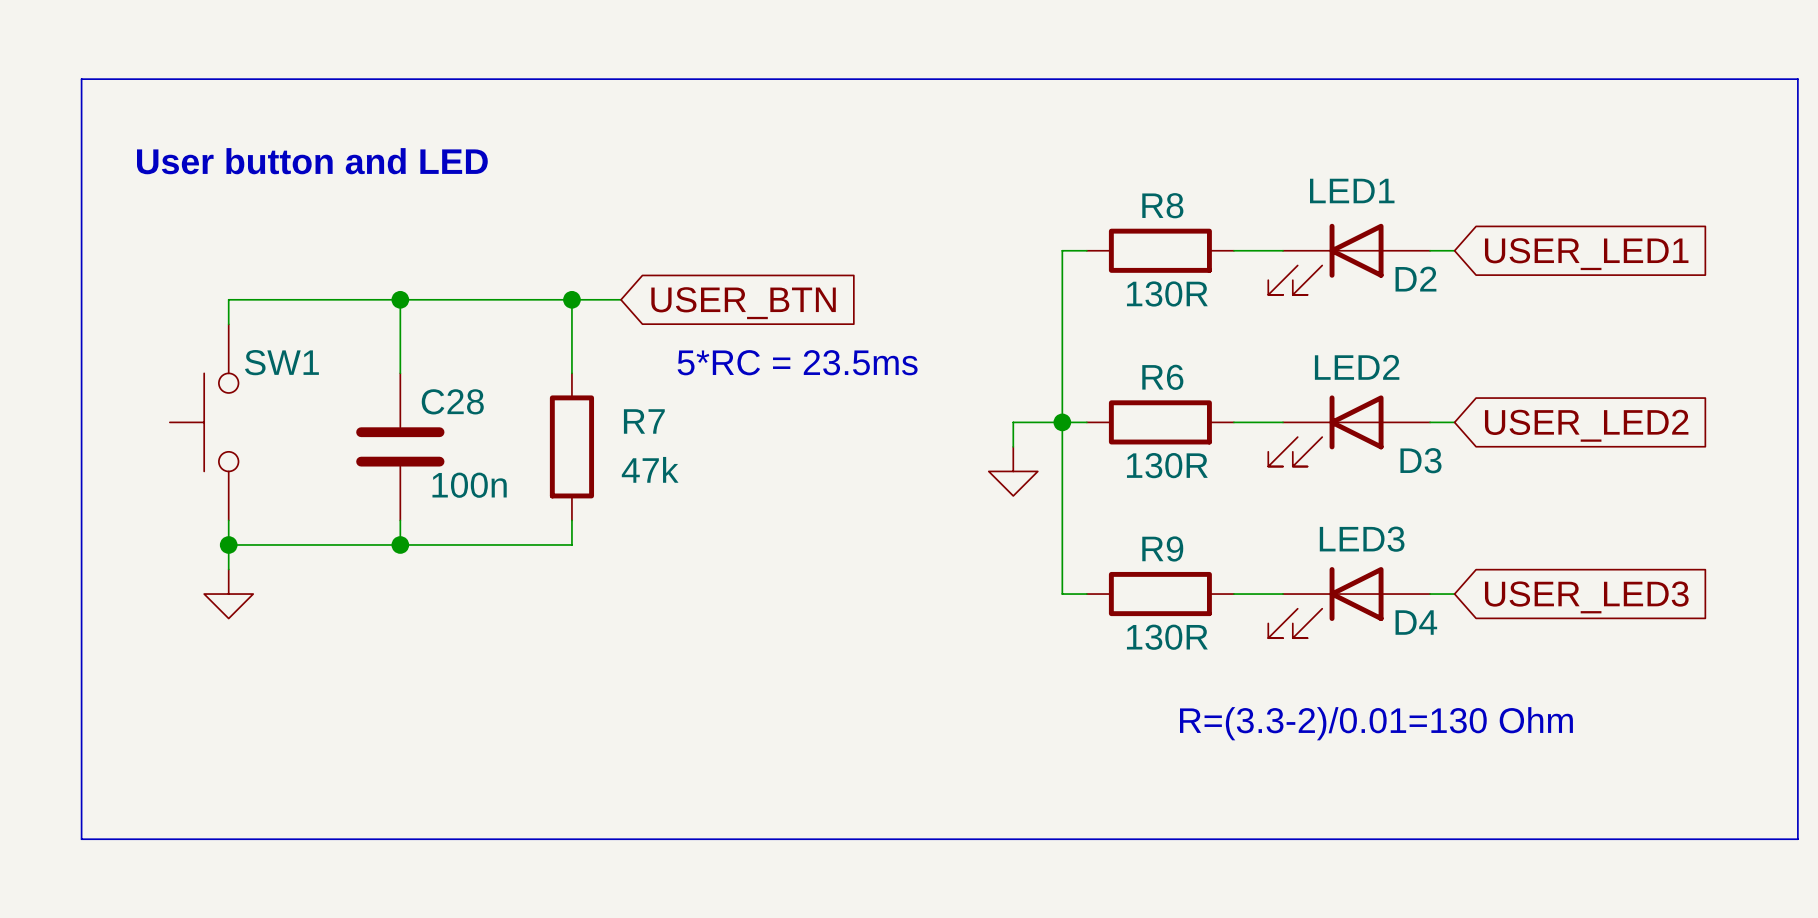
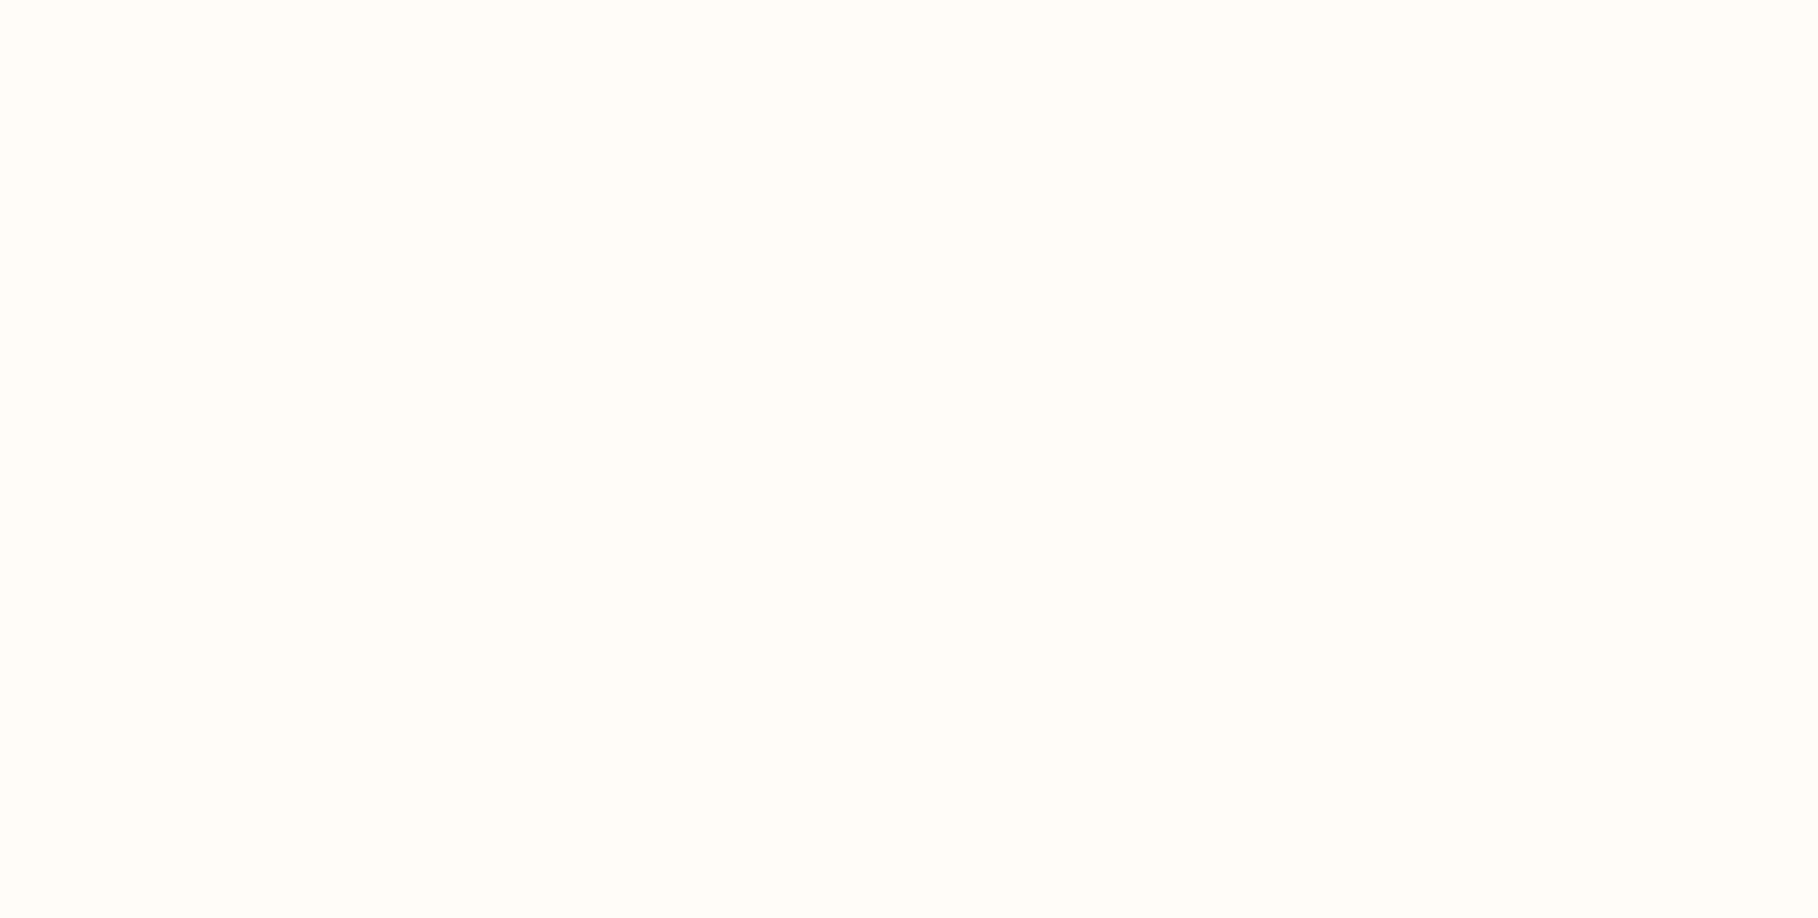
line: (81, 79) (1797, 79) (1797, 839) (81, 839) (81, 79) -> none
text: User button and LED (312, 161) -> none
wire: (1086, 250) (1062, 250) (1062, 594) (1086, 594) -> none
R8: 130R (1160, 250) -> none
wire: (1233, 250) (1283, 250) -> none
wire: (1430, 250) (1454, 250) -> none
global label: USER_LED1 (1586, 254) -> none
D2: LED1 (1349, 259) -> none
wire: (400, 299) (400, 373) -> none
junction: (400, 299) -> none
wire: (571, 299) (571, 373) -> none
junction: (571, 299) -> none
wire: (620, 299) (228, 299) (228, 324) -> none
global label: USER_BTN (743, 303) -> none
text: 5*RC = 23.5ms (797, 362) -> none
SW1: (204, 422) -> none
junction: (1062, 422) -> none
wire: (1086, 422) (1013, 422) (1013, 446) -> none
R6: 130R (1160, 422) -> none
wire: (1233, 422) (1283, 422) -> none
wire: (1430, 422) (1454, 422) -> none
global label: USER_LED2 (1586, 425) -> none
D3: LED2 (1349, 430) -> none
C28: 100n (400, 446) -> none
R7: 47k (571, 446) -> none
power symbol: (1013, 471) -> none
wire: (228, 520) (228, 569) -> none
wire: (400, 520) (400, 544) -> none
wire: (571, 520) (571, 544) (228, 544) -> none
junction: (228, 544) -> none
junction: (400, 544) -> none
power symbol: (228, 594) -> none
R9: 130R (1160, 594) -> none
wire: (1233, 594) (1283, 594) -> none
wire: (1430, 594) (1454, 594) -> none
global label: USER_LED3 (1586, 597) -> none
D4: LED3 (1349, 602) -> none
text: R=(3.3-2)/0.01=130 Ohm (1376, 723) -> none

